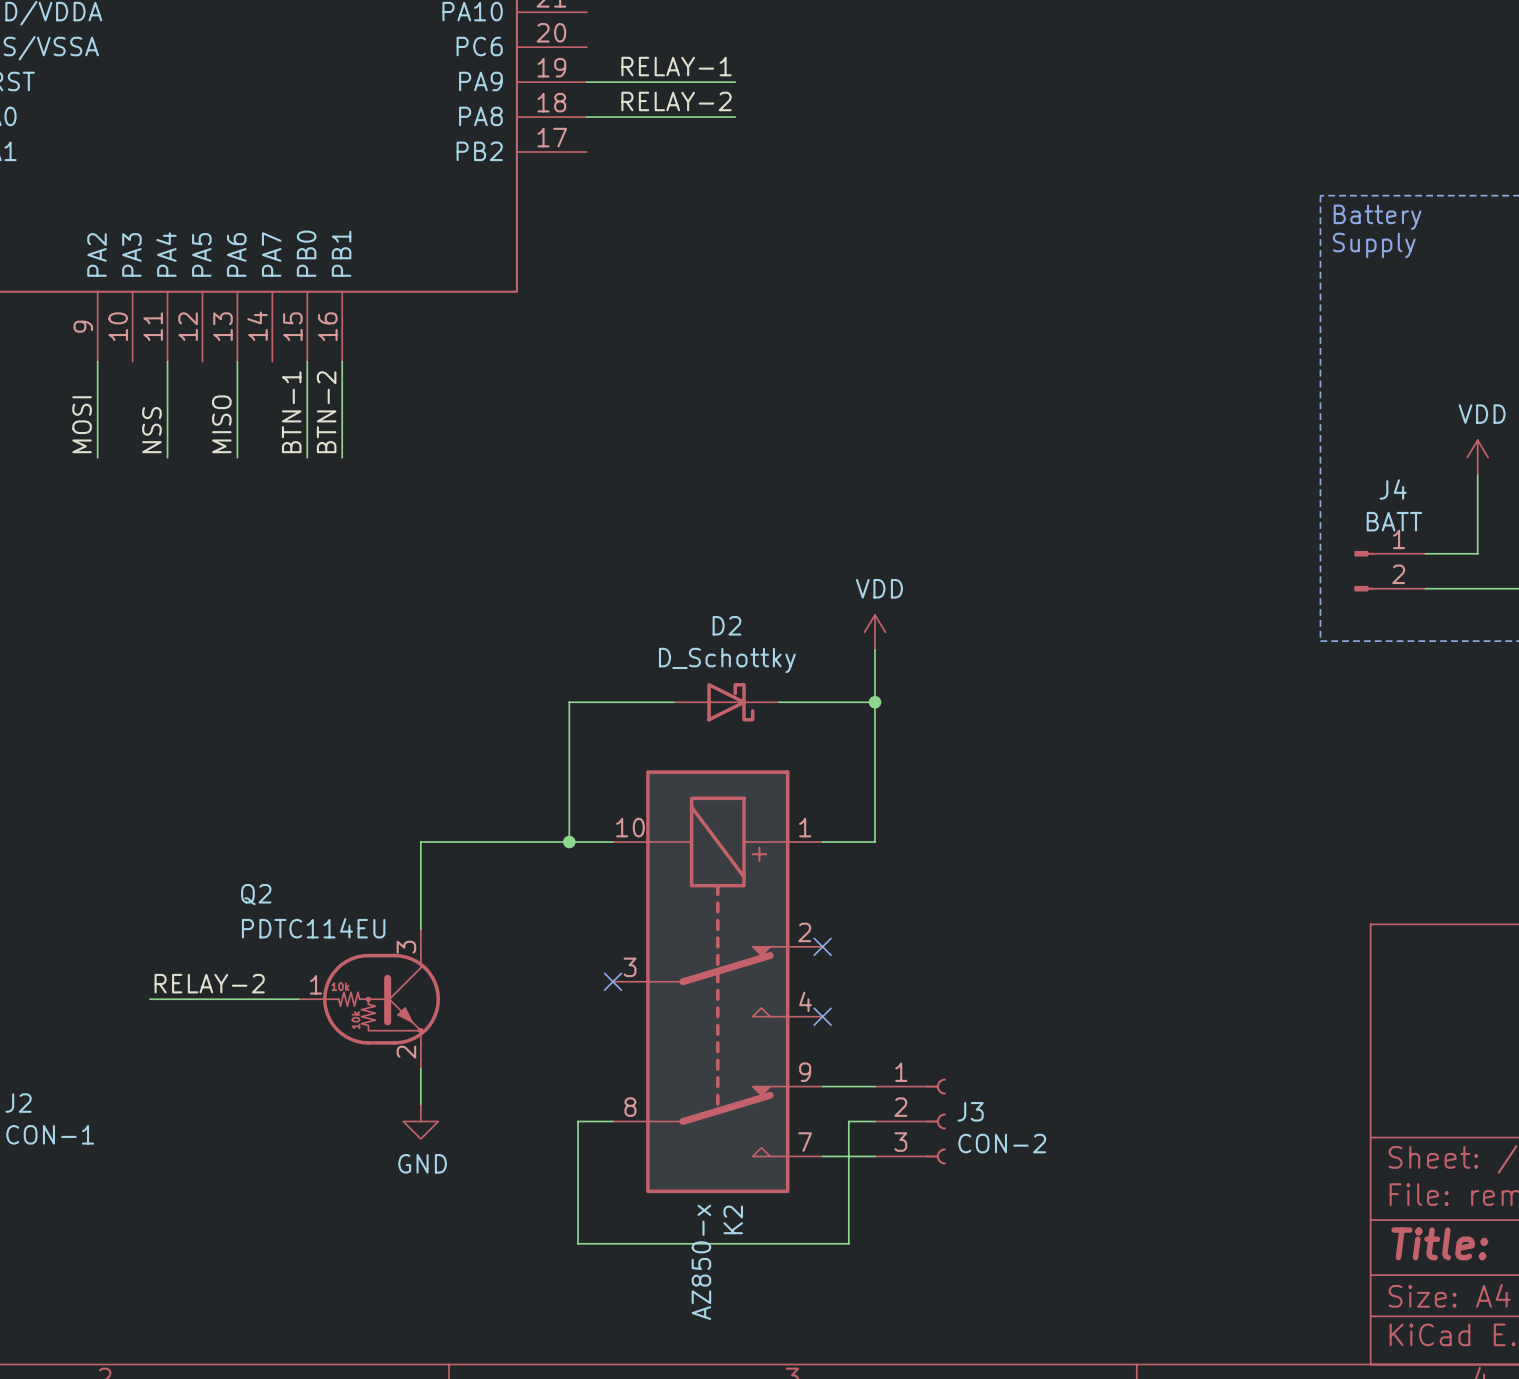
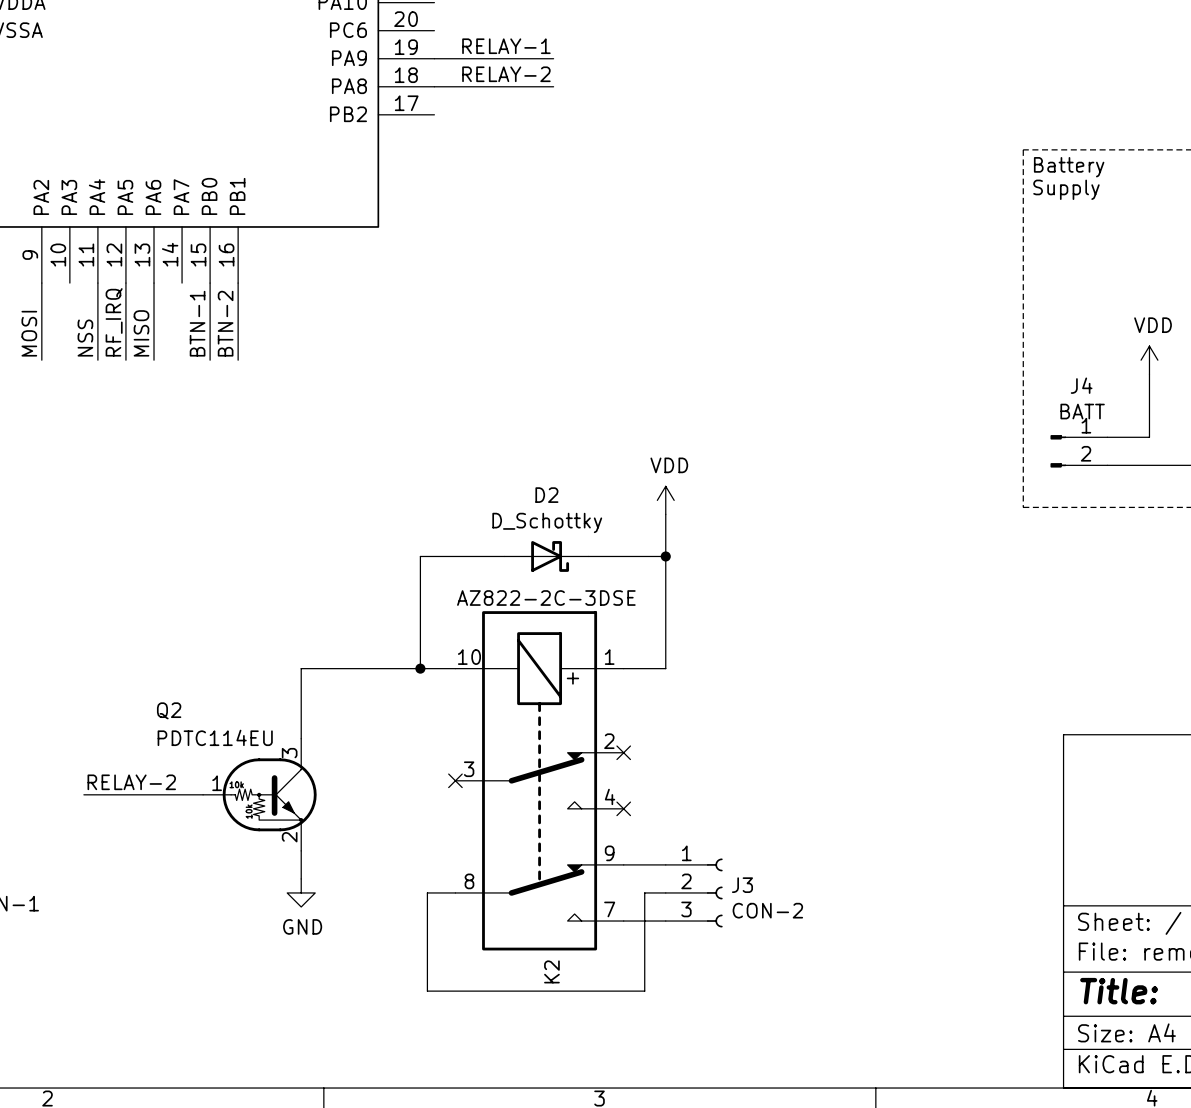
wire: none -> (125, 283) (125, 360)
label: none -> RF_IRQ (114, 322)
K2 value: AZ850-x (701, 1262) -> AZ822-2C-3DSE (546, 598)

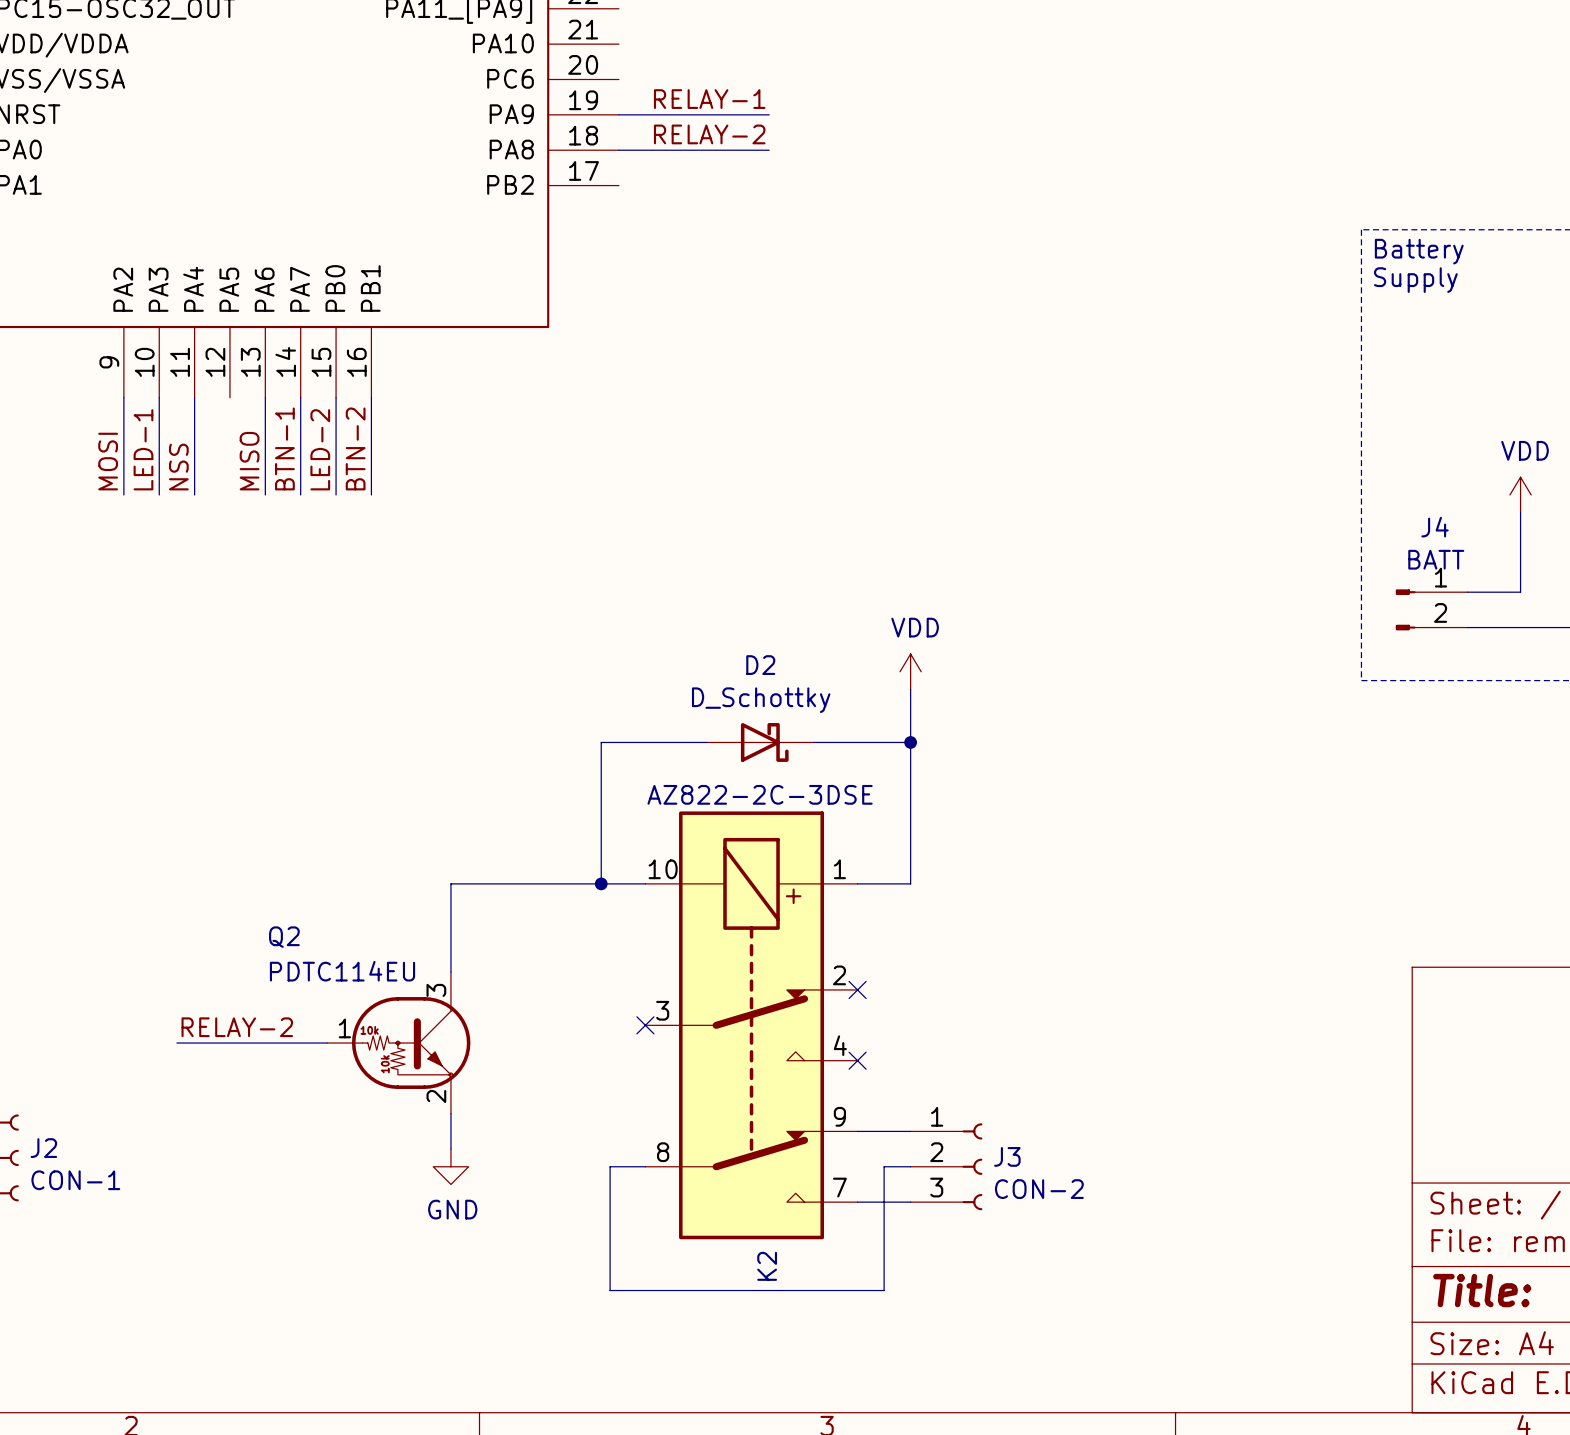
wire: (125, 283) (125, 360) -> (159, 397) (159, 494)
wire: none -> (300, 397) (300, 494)
label: RF_IRQ (114, 322) -> none
label: none -> BTN-1 (284, 448)
label: BTN-1 (197, 323) -> LED-2 (320, 449)
label: none -> LED-1 (143, 449)

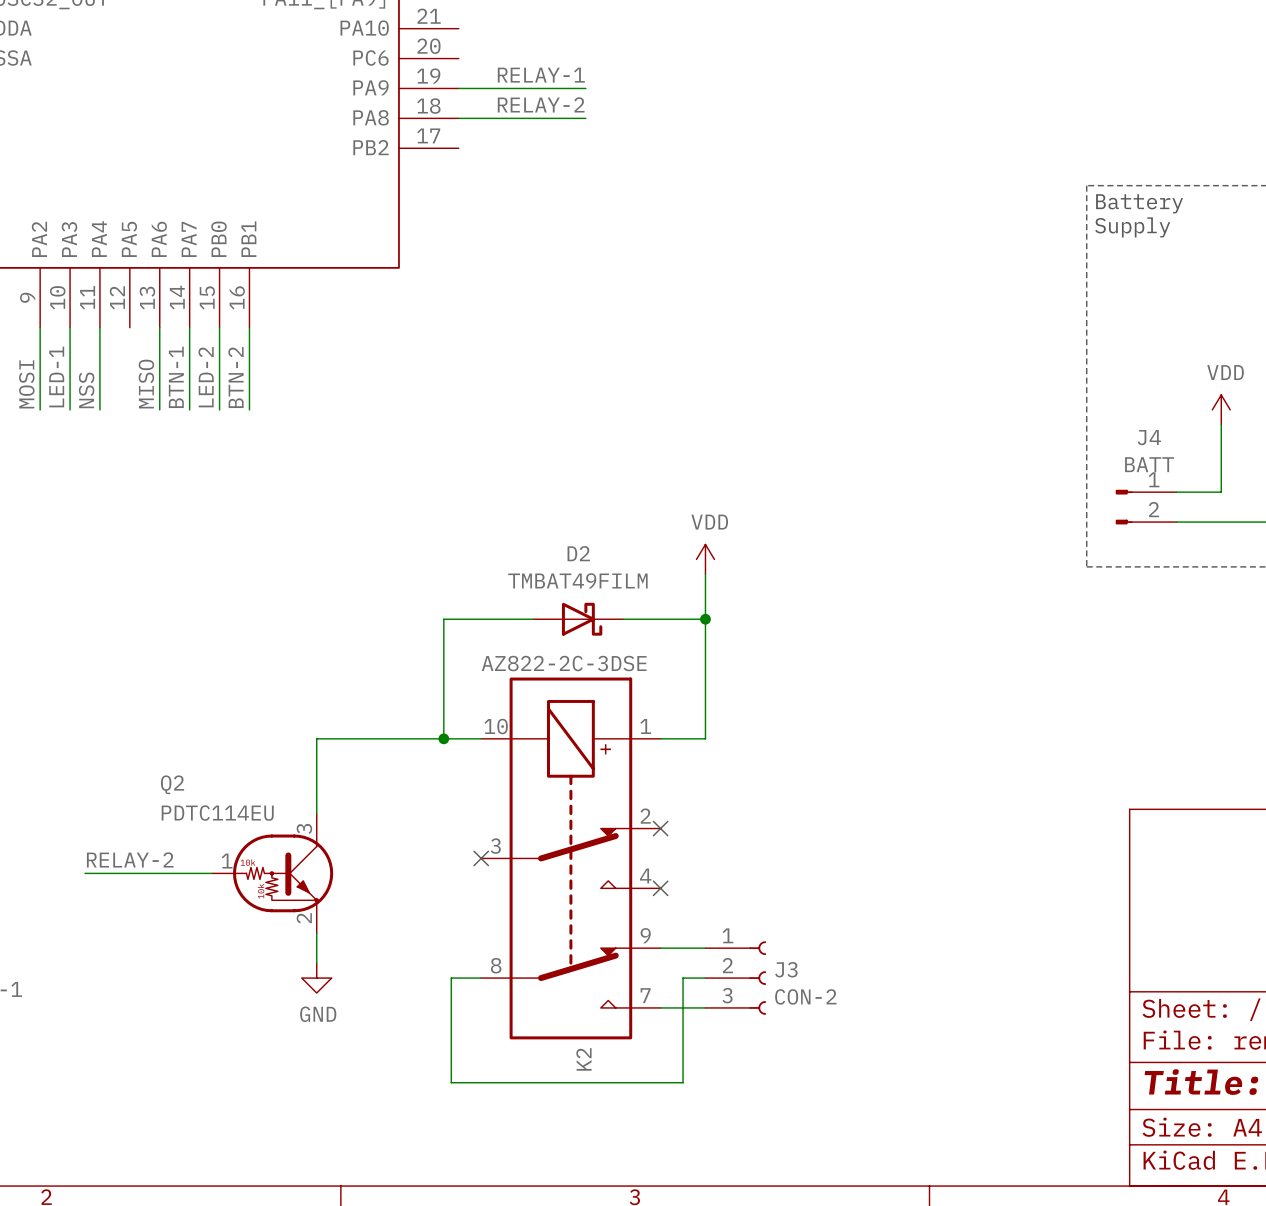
D2 value: D_Schottky (761, 700) -> TMBAT49FILM (577, 580)

